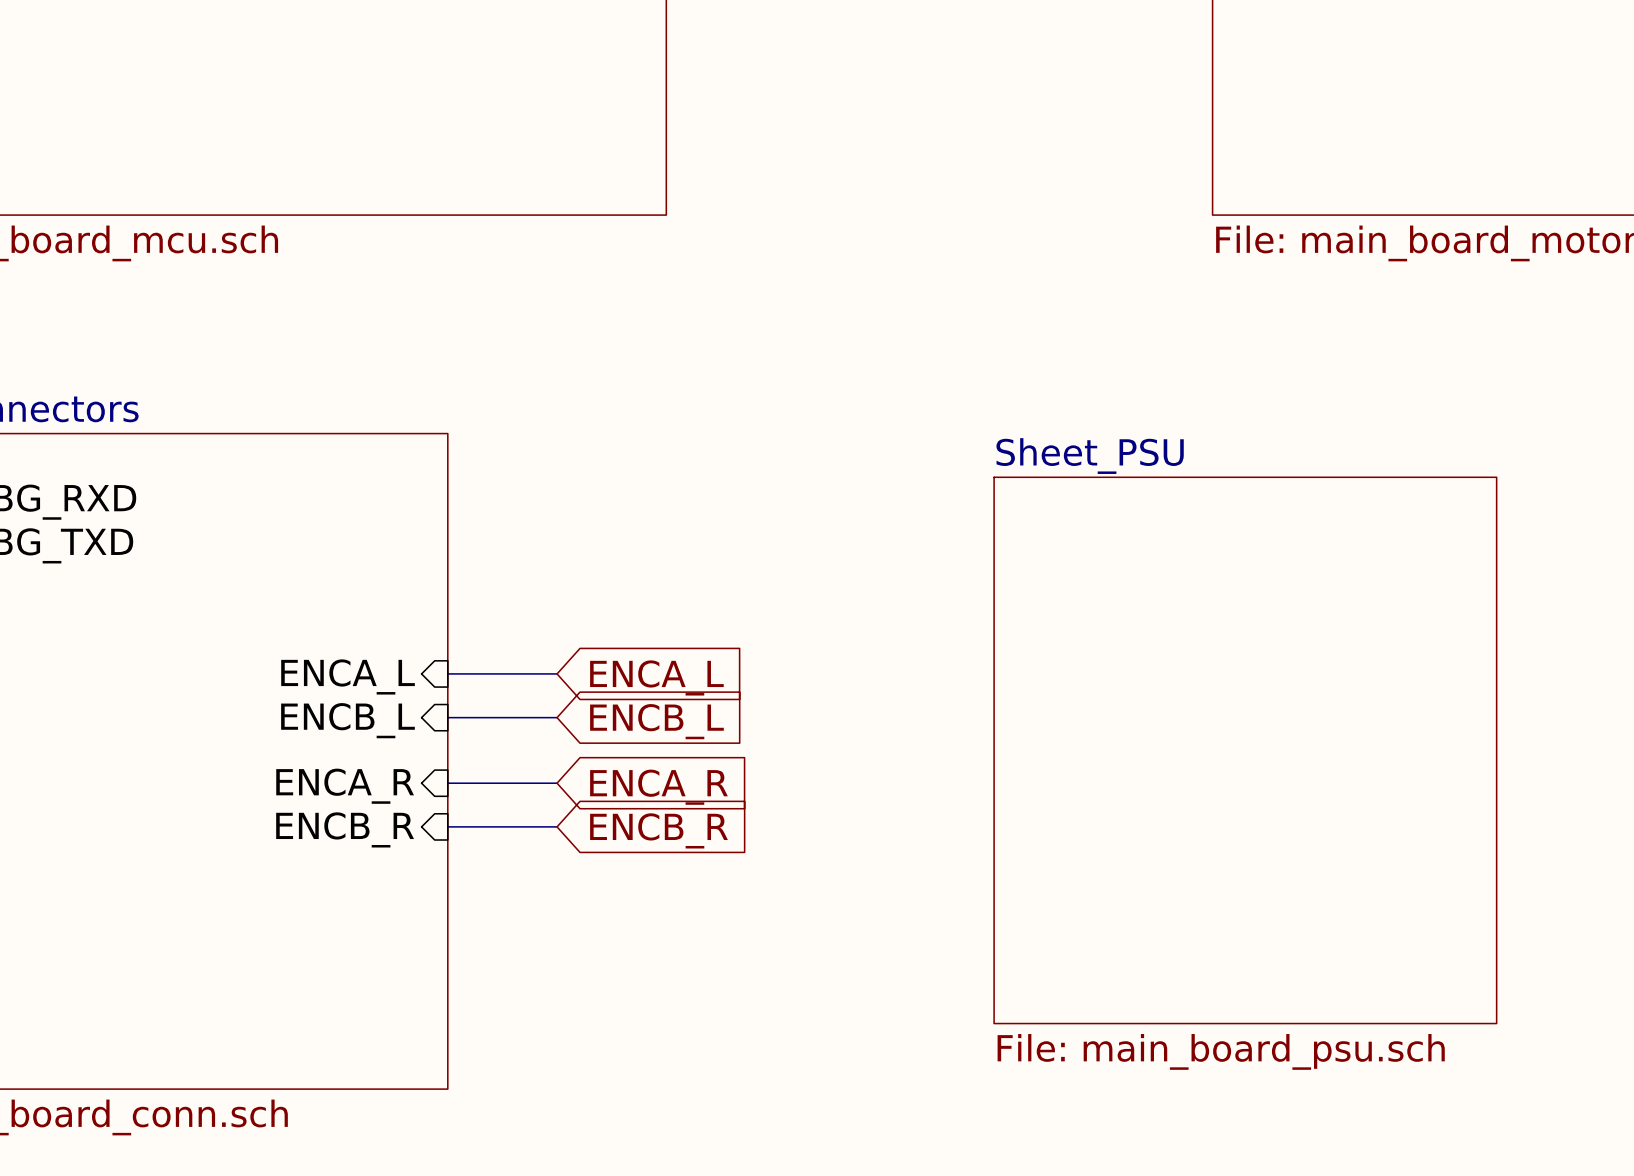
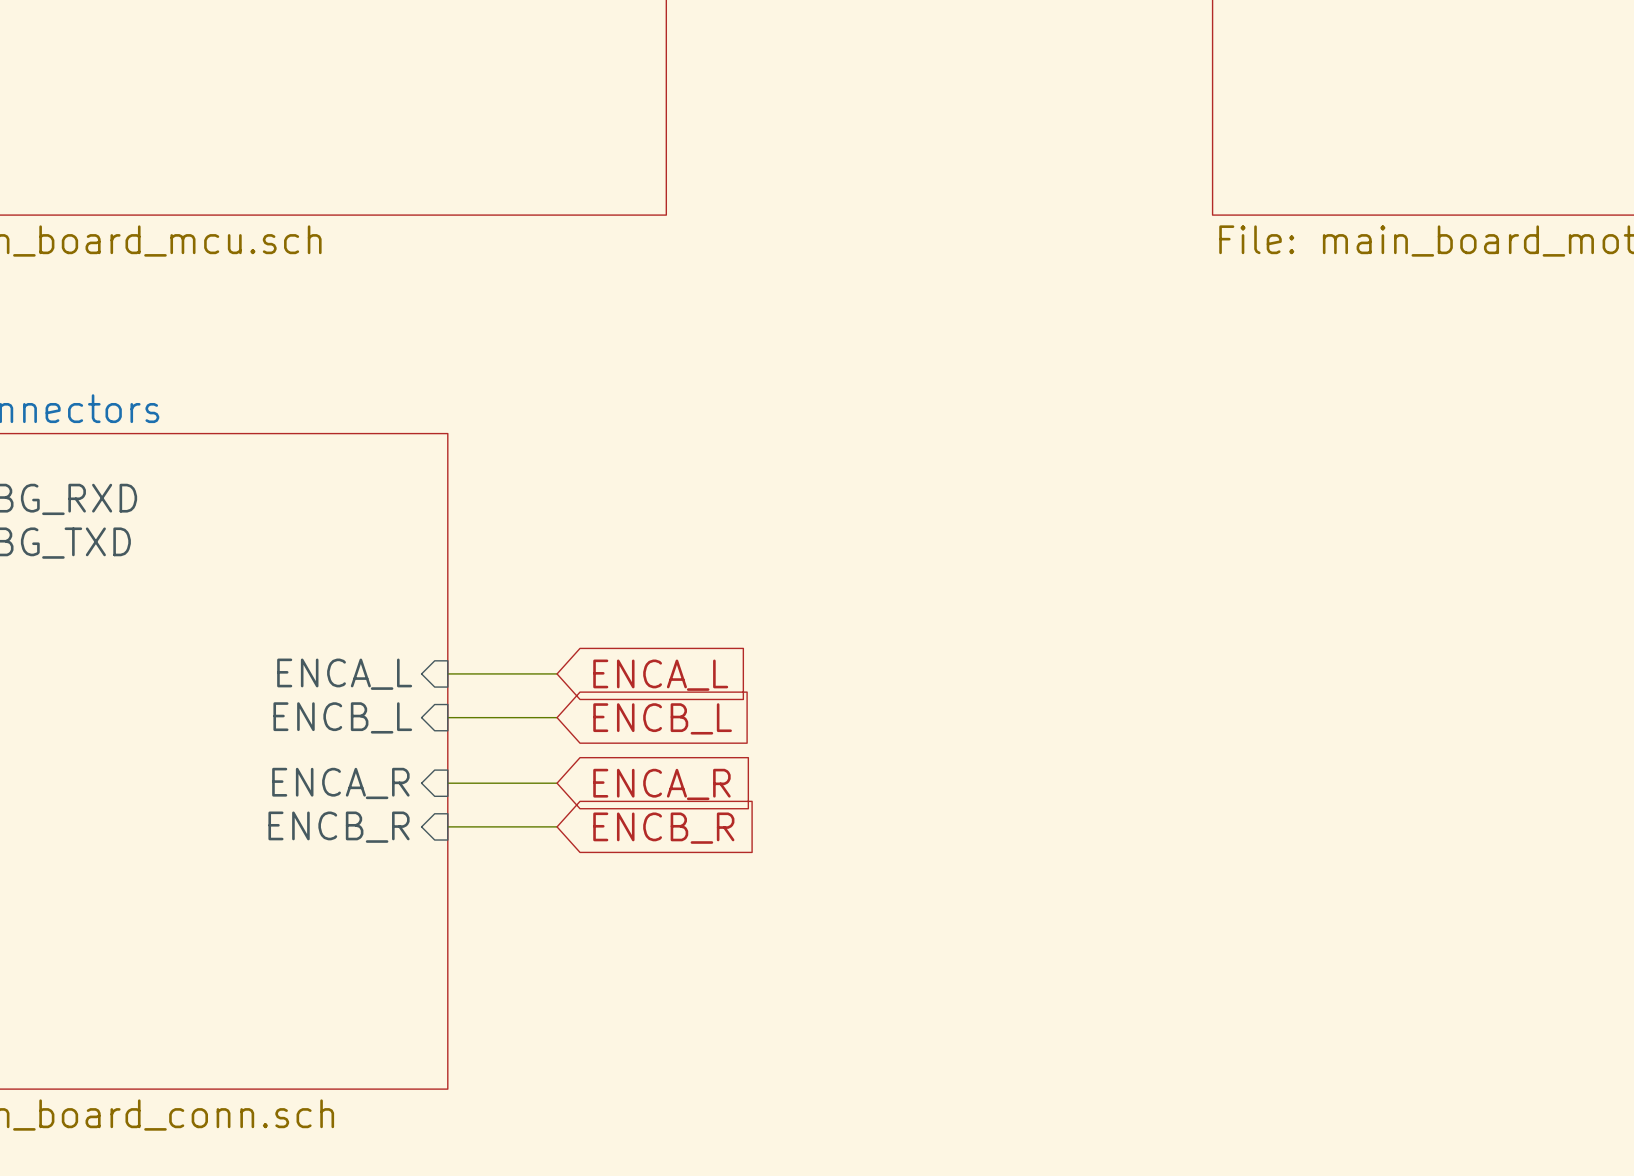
sheet Sheet_PSU: File: main_board_psu.sch (1245, 750) -> none

